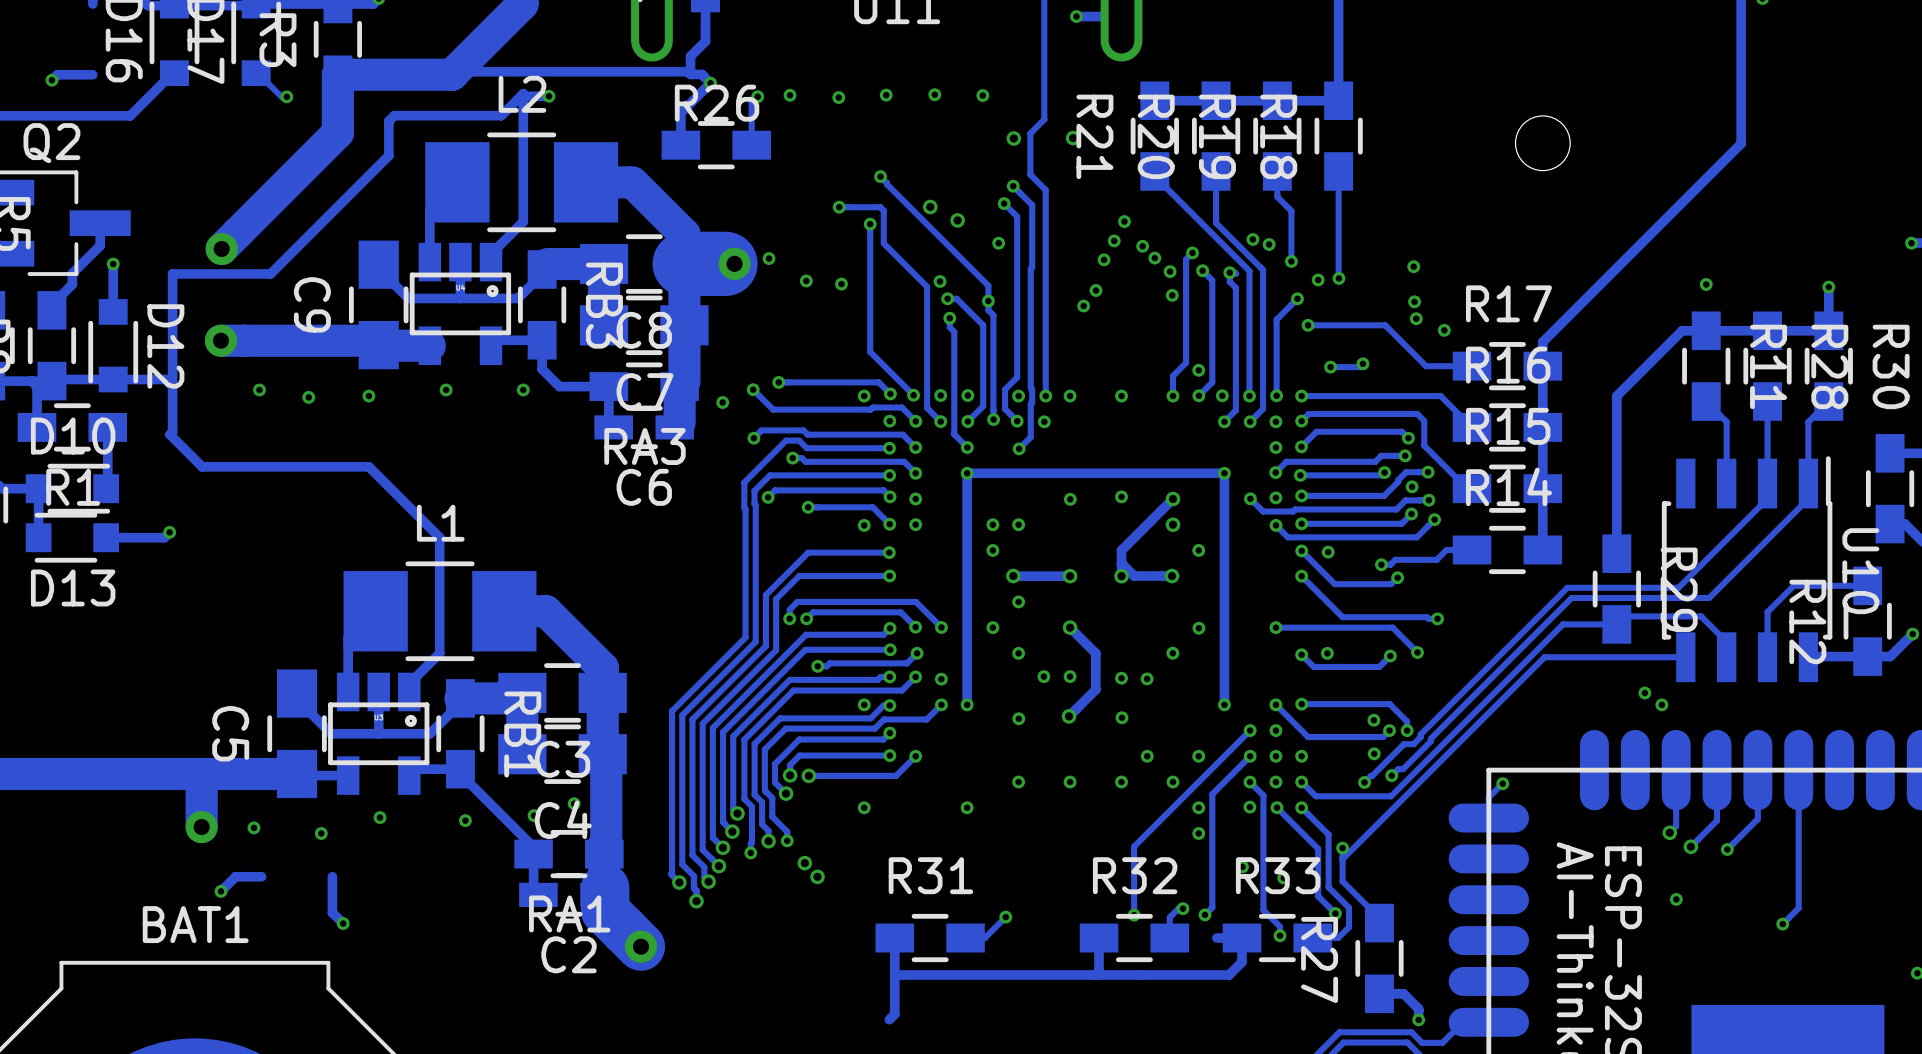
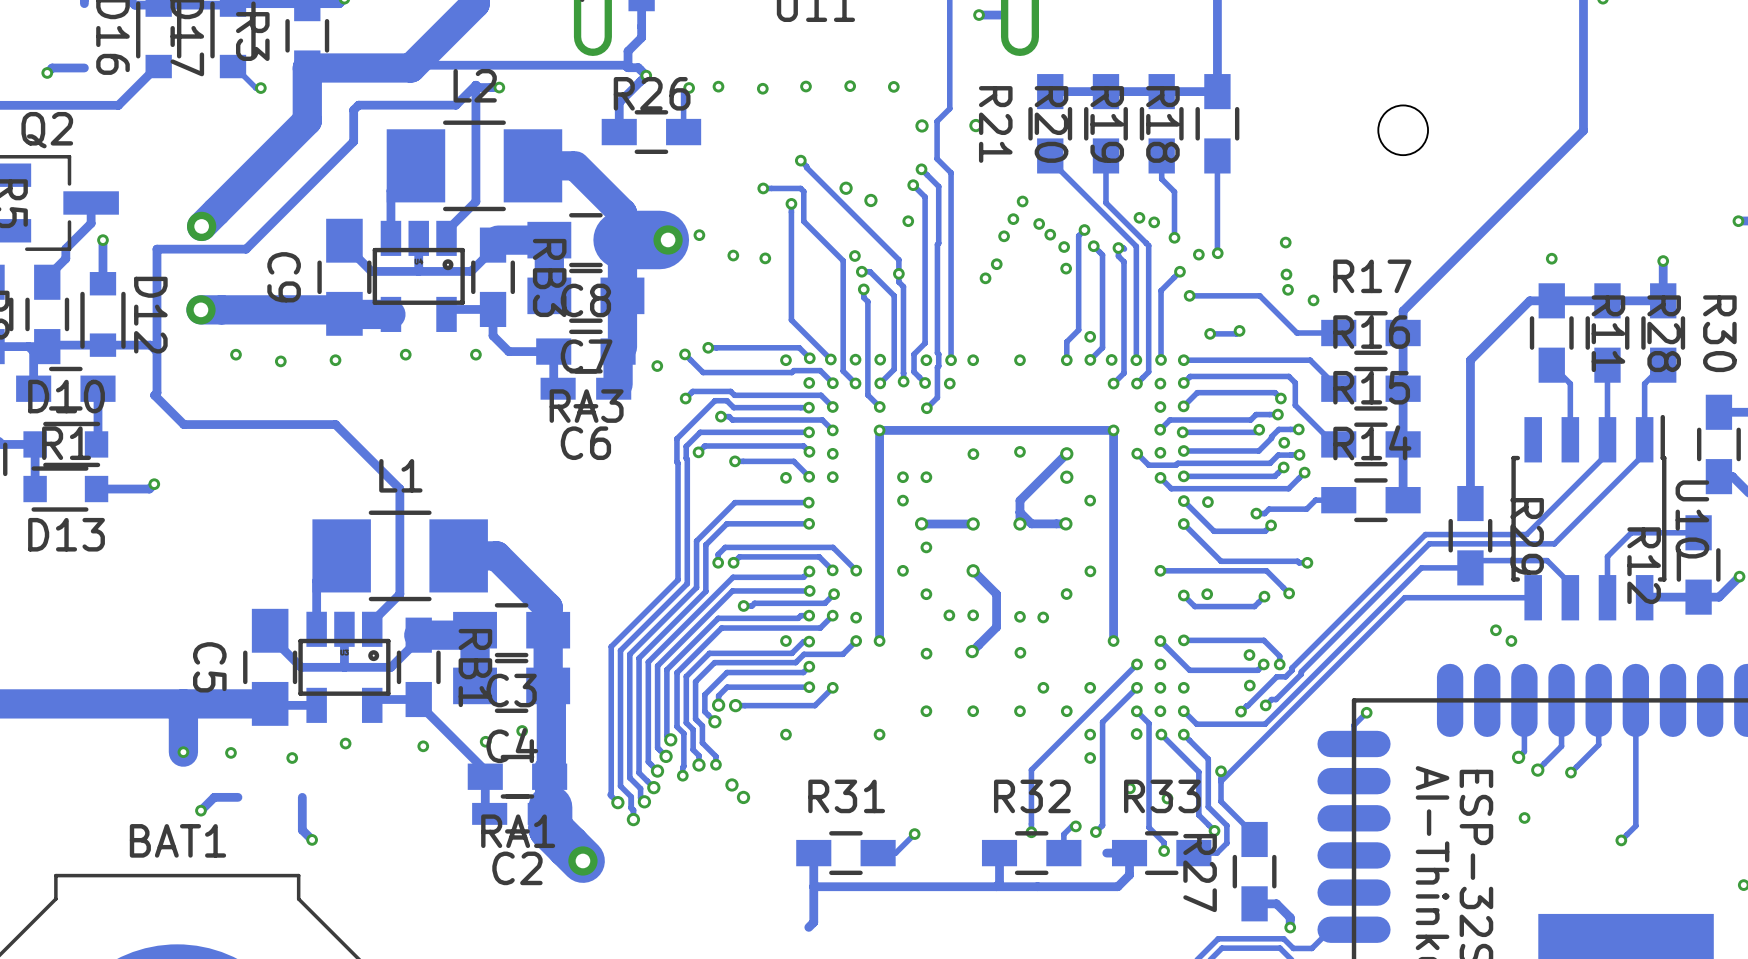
via size: [185, 810, 218, 844] -> [177, 746, 190, 759]

